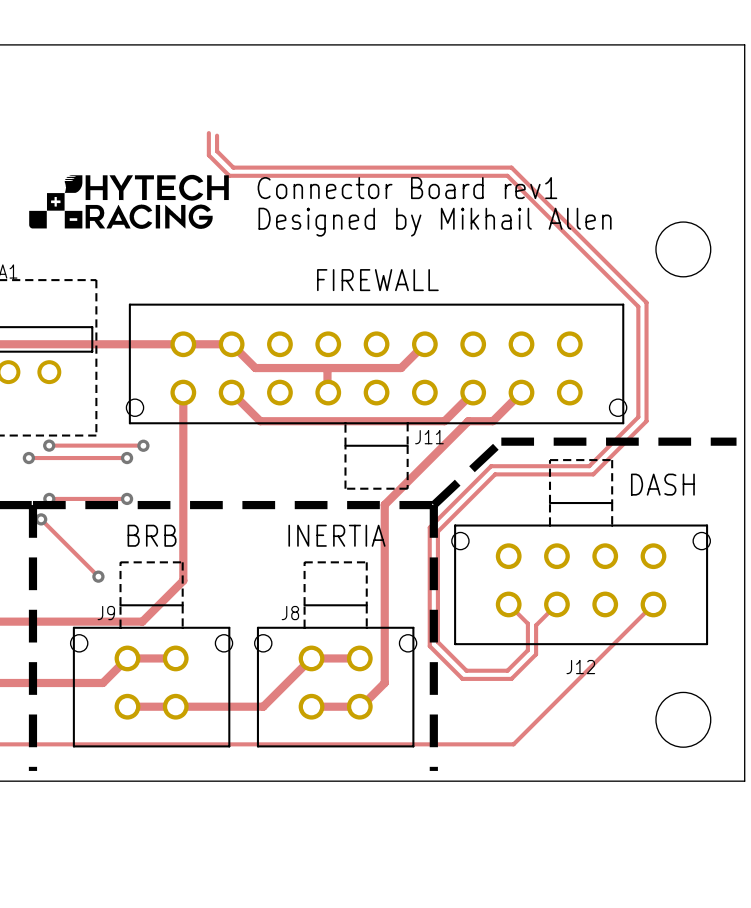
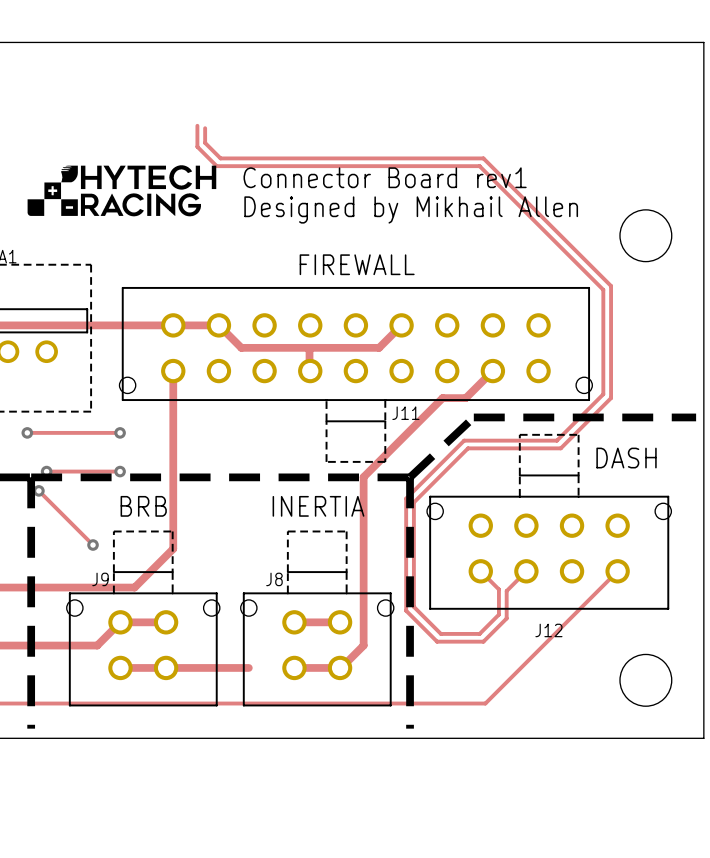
track: (231, 392) (260, 421) (444, 421) (473, 392) -> none
track: (49, 445) (143, 445) -> none
via: (49, 445) -> none
via: (143, 445) -> none
track: (311, 658) (263, 706) -> none

